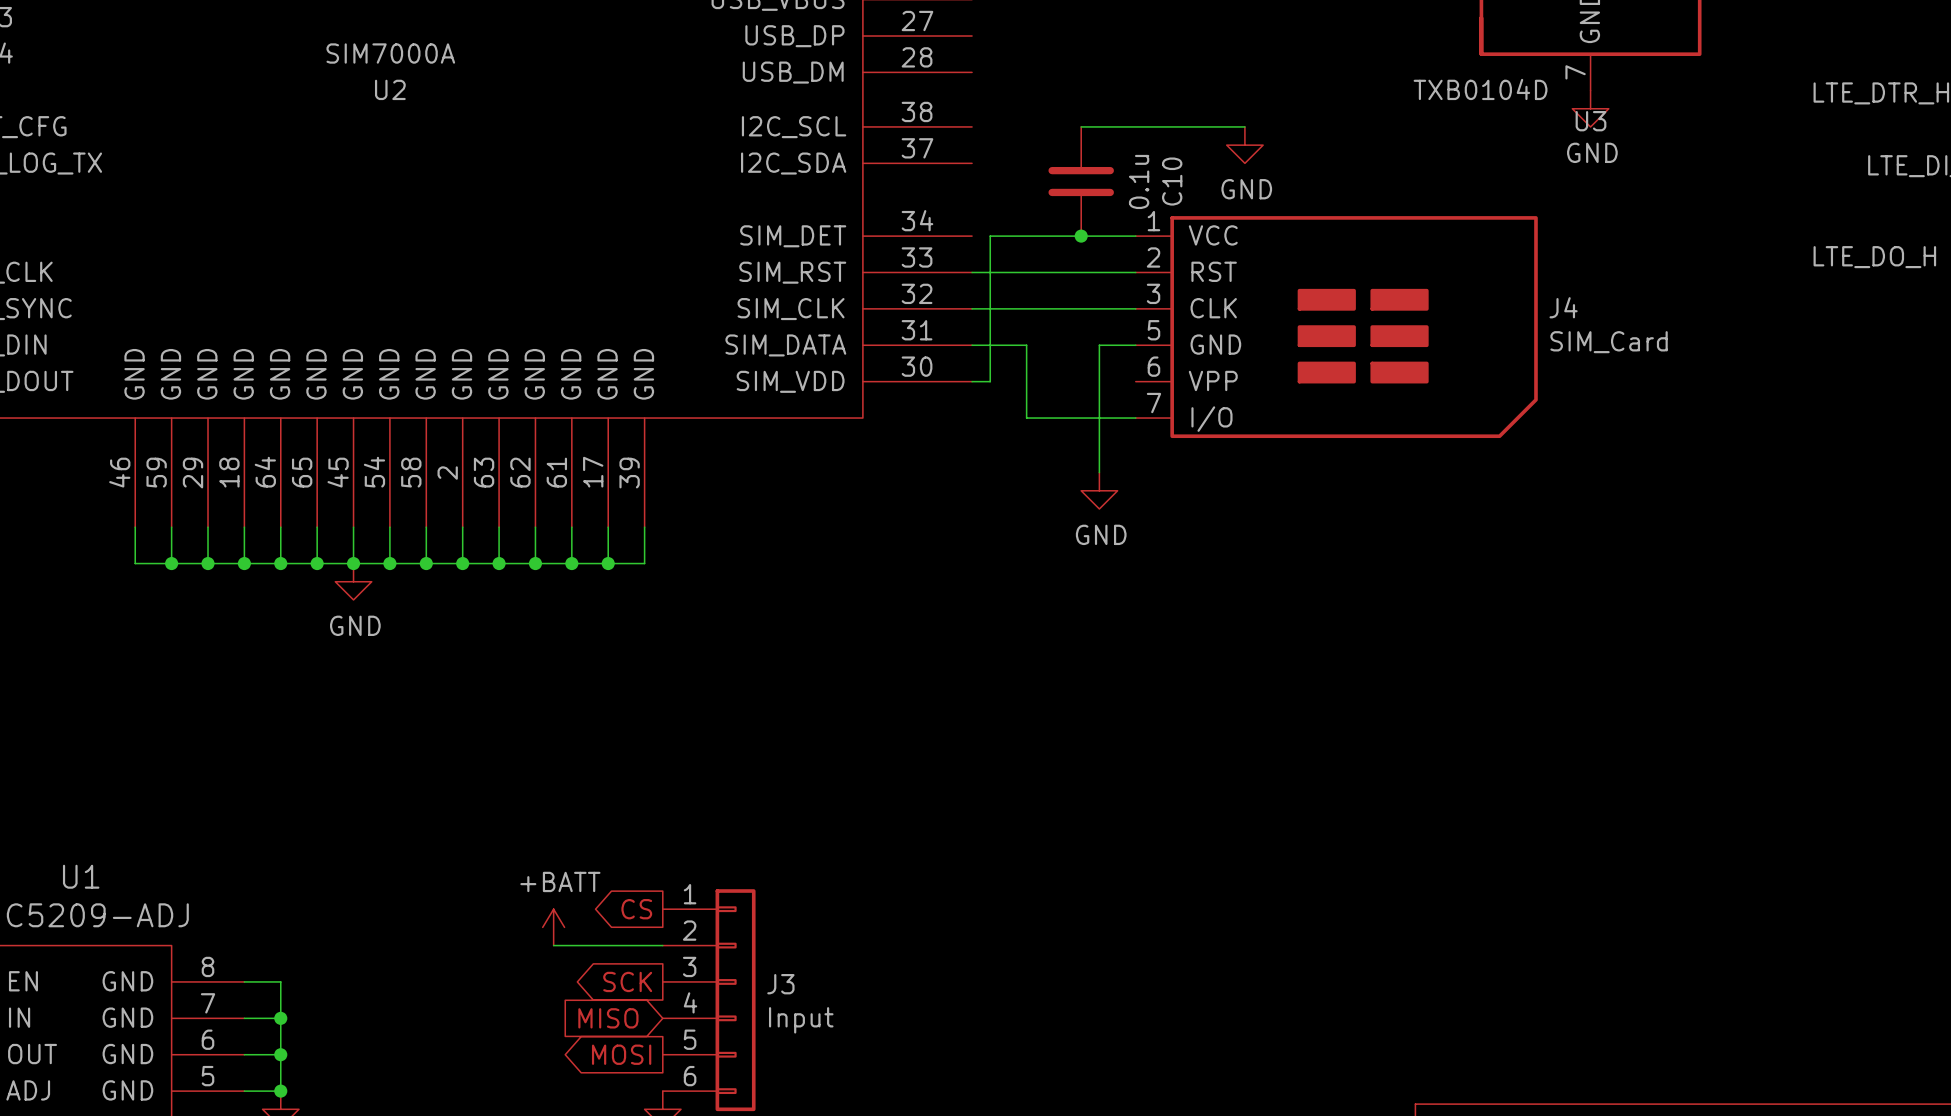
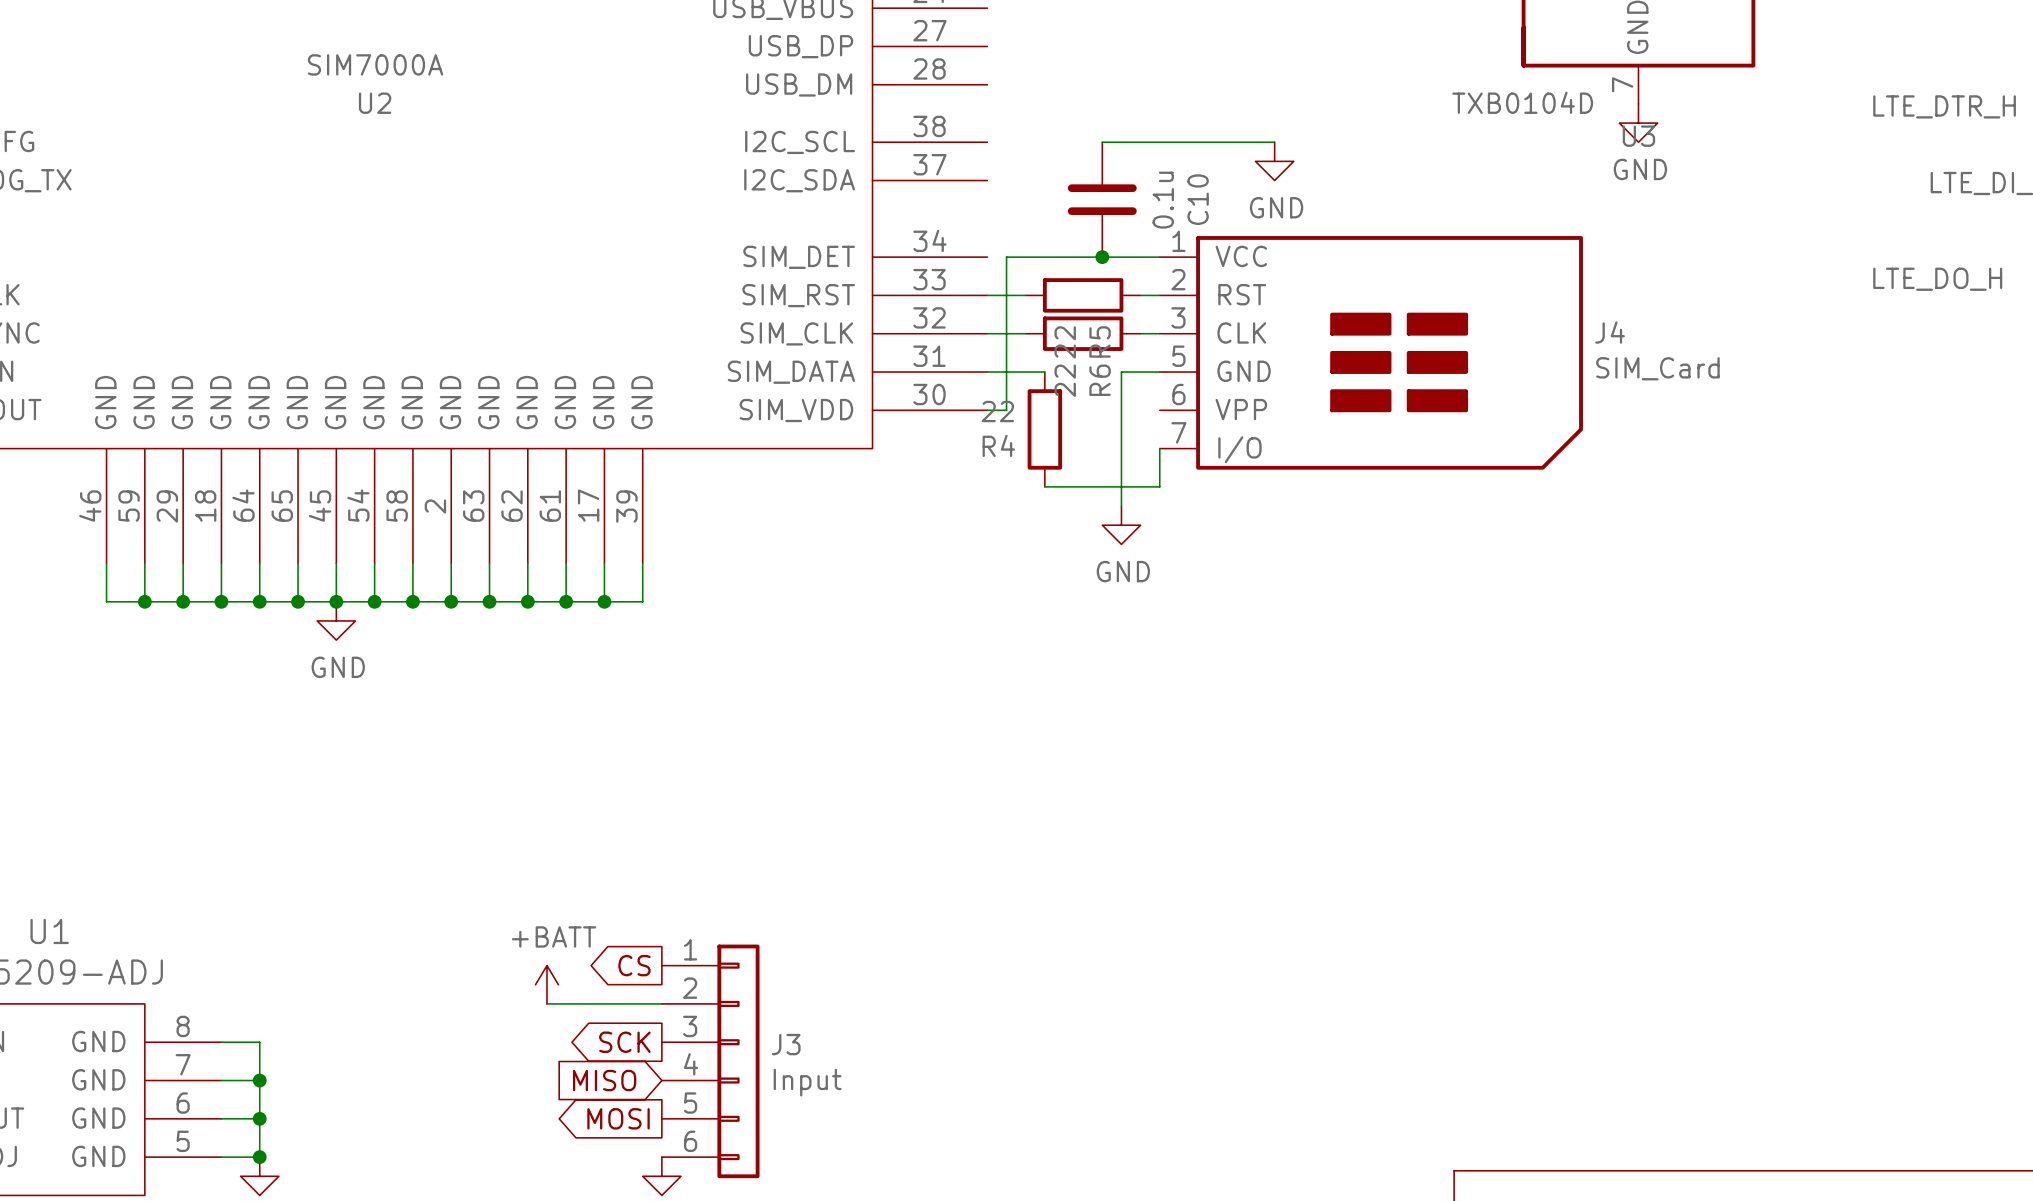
wire: (1008, 272) (1117, 272) -> none
R5: none -> 22 (1083, 295)
wire: (1008, 308) (1117, 308) -> none
R6: none -> 22 (1083, 333)
wire: (1026, 345) (1026, 418) (1135, 418) -> (1044, 486) (1159, 486) (1159, 448)
R4: none -> 22 (1044, 429)

